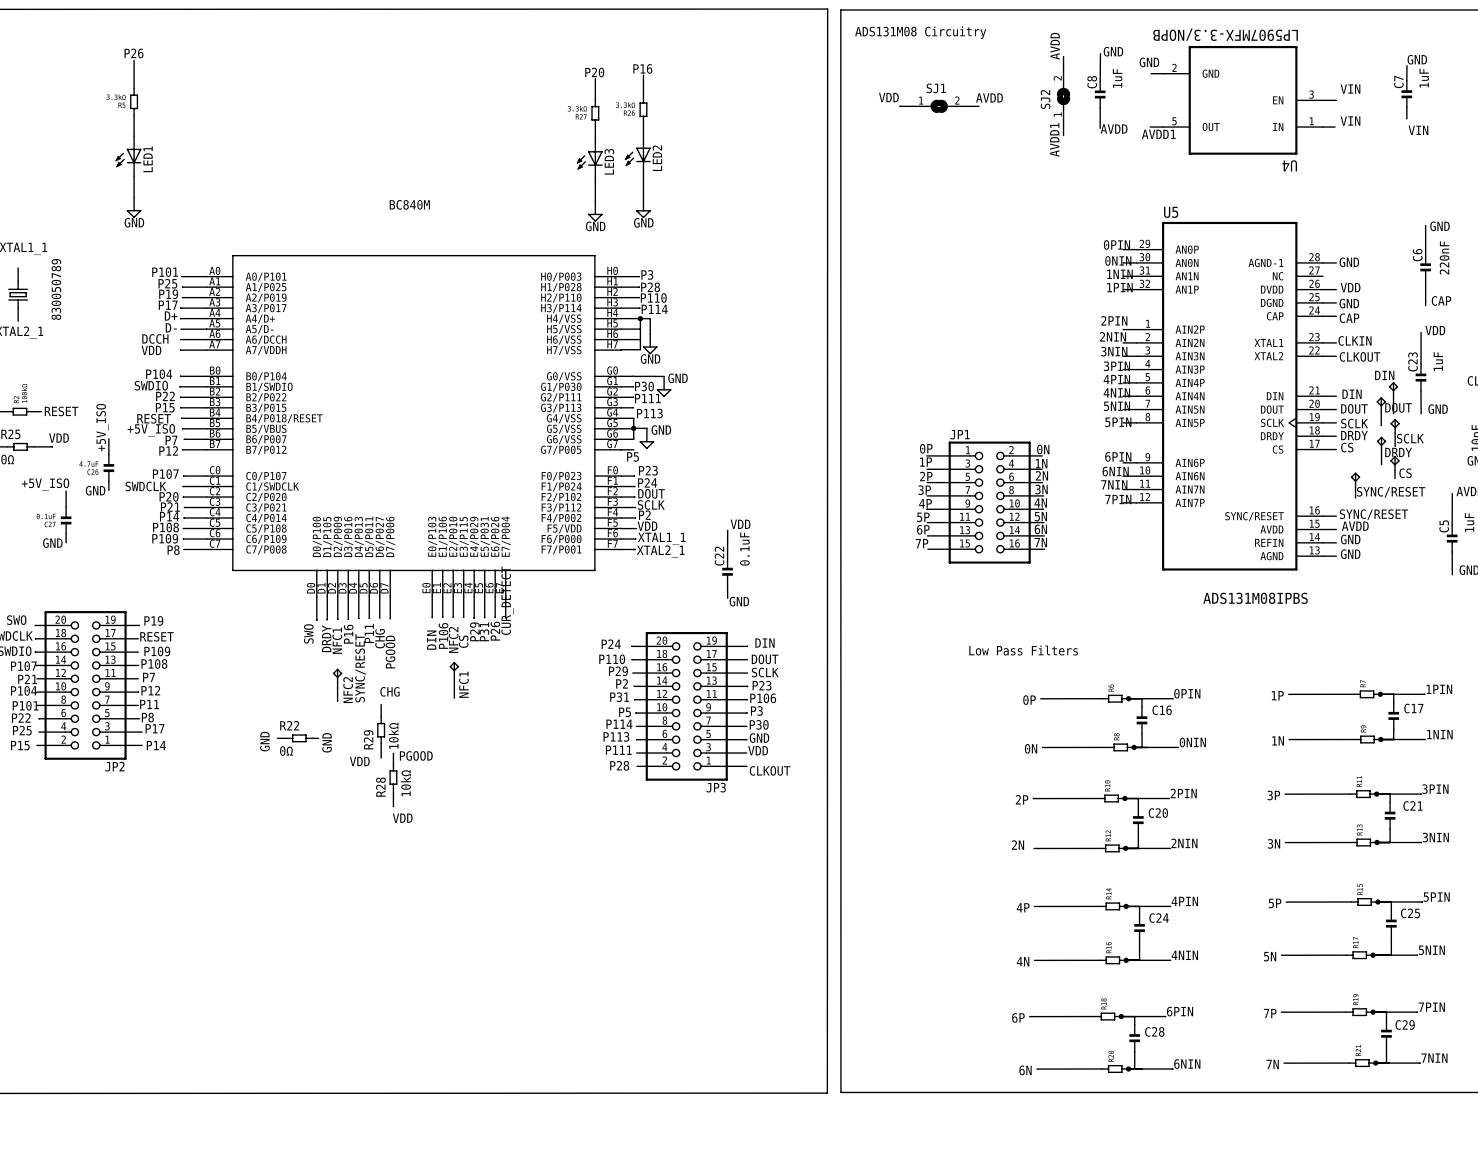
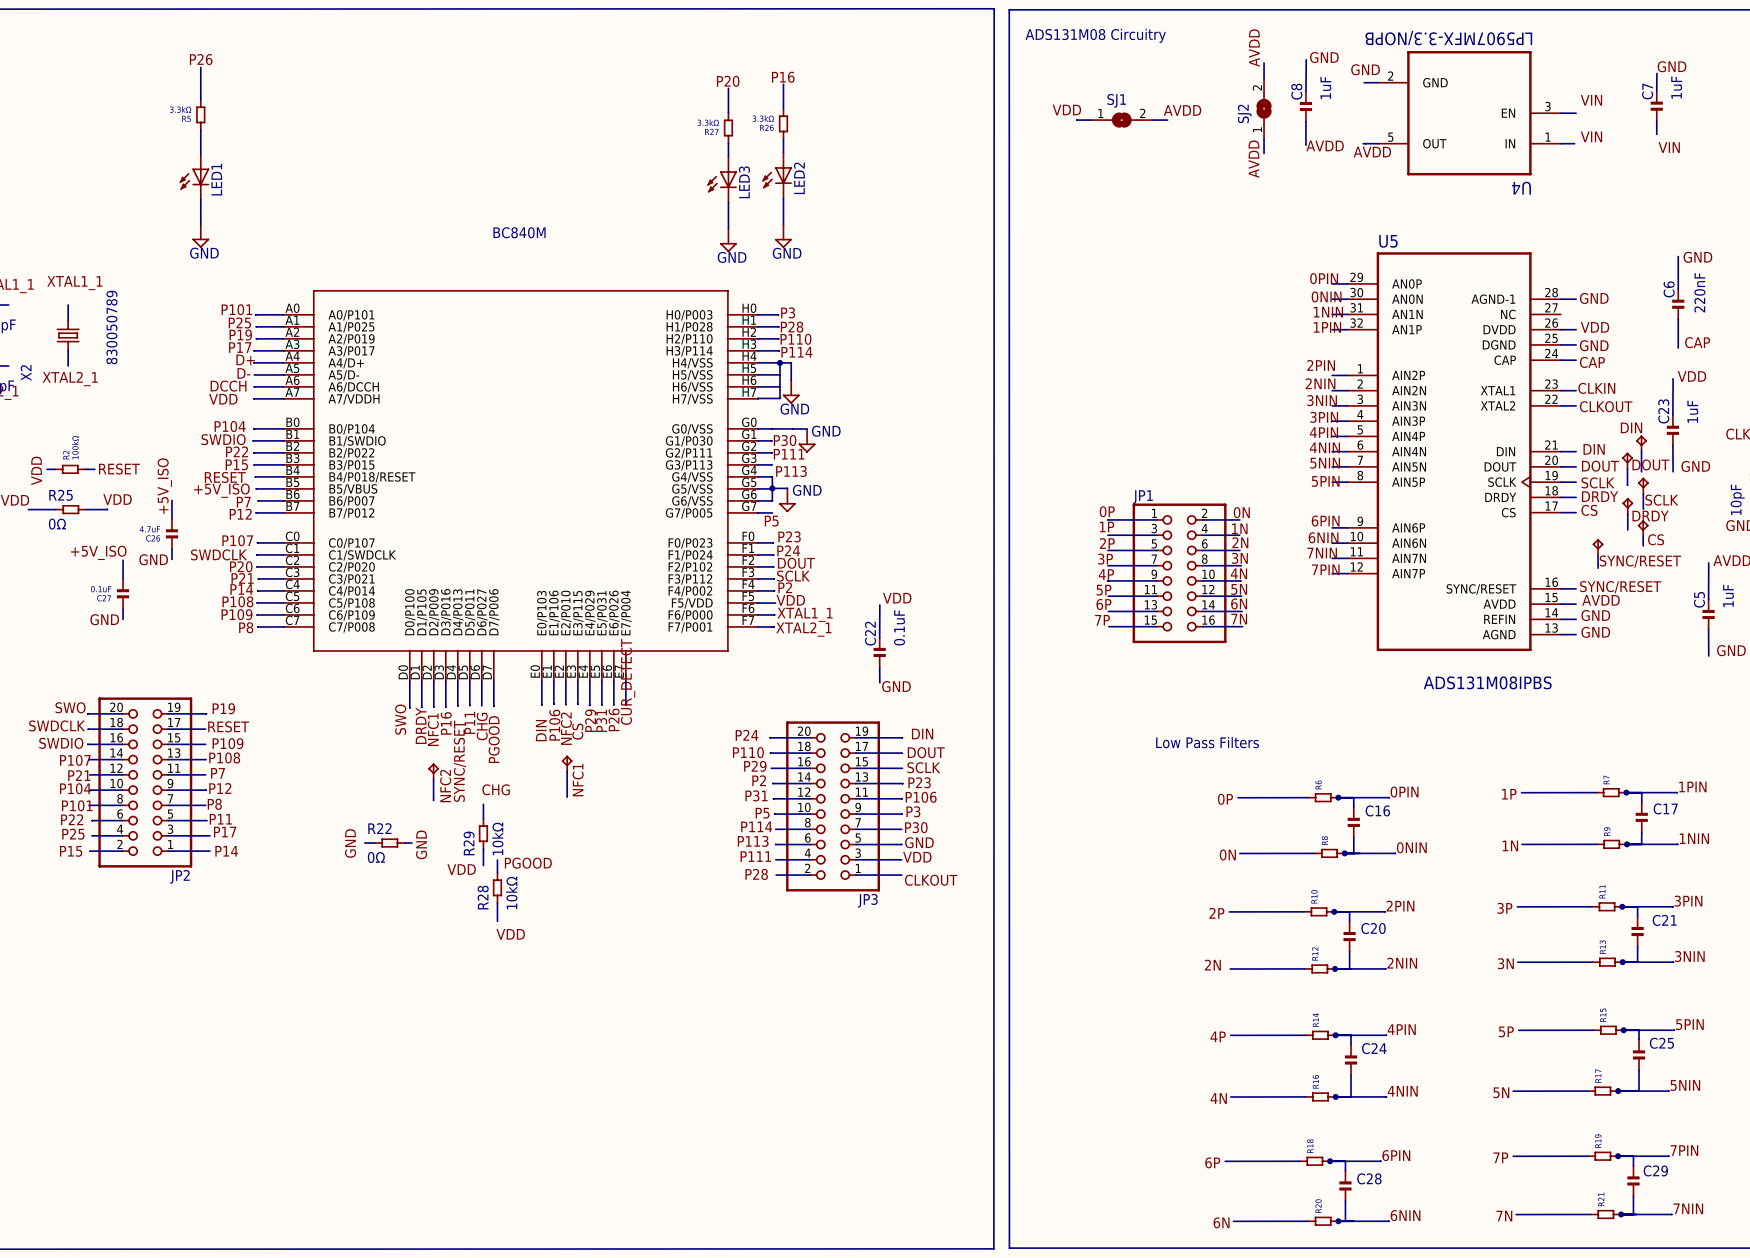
label: AVDD1 (1158, 134) -> AVDD (1372, 152)
label: AVDD1 (1054, 139) -> AVDD (1253, 159)
label: P11 (149, 704) -> P8 (214, 804)
label: P8 (147, 717) -> P11 (220, 819)

